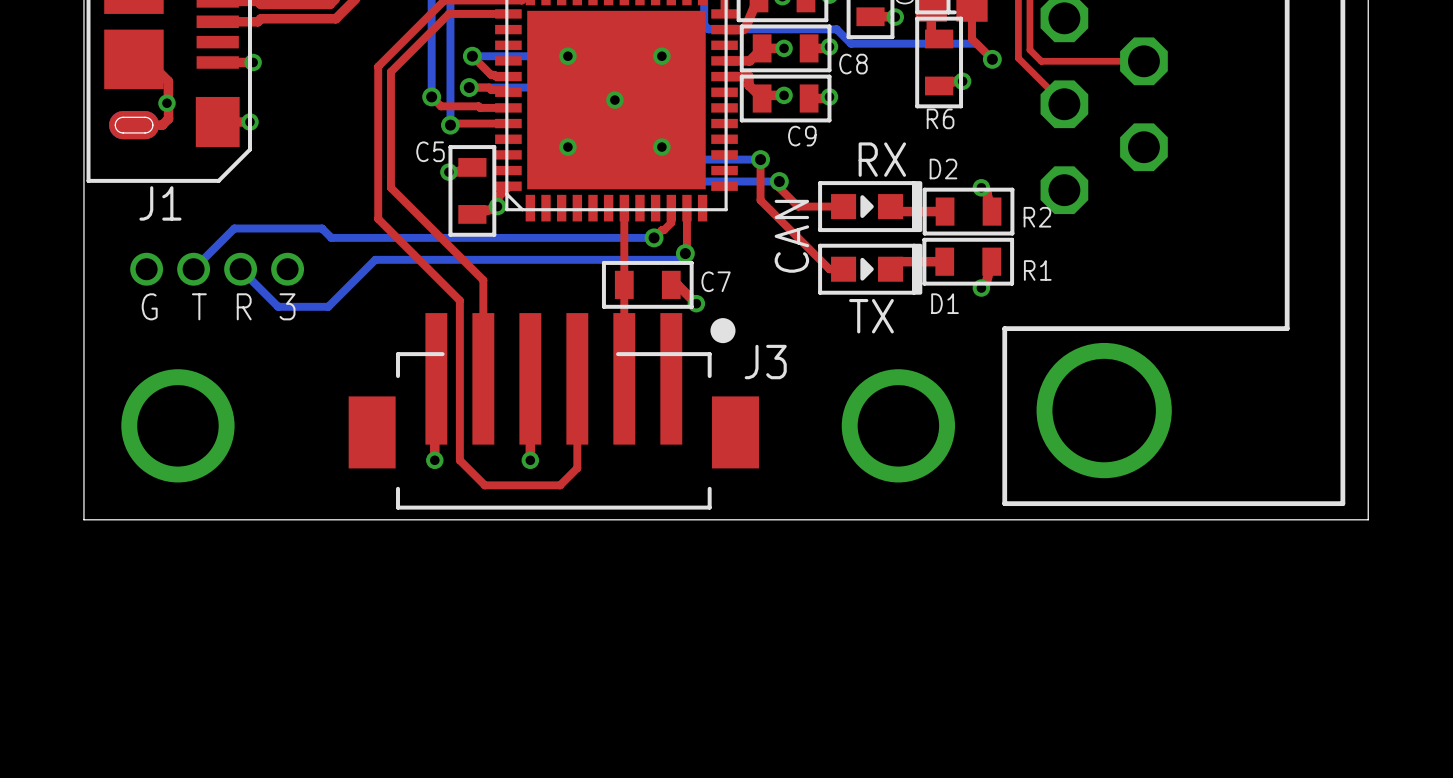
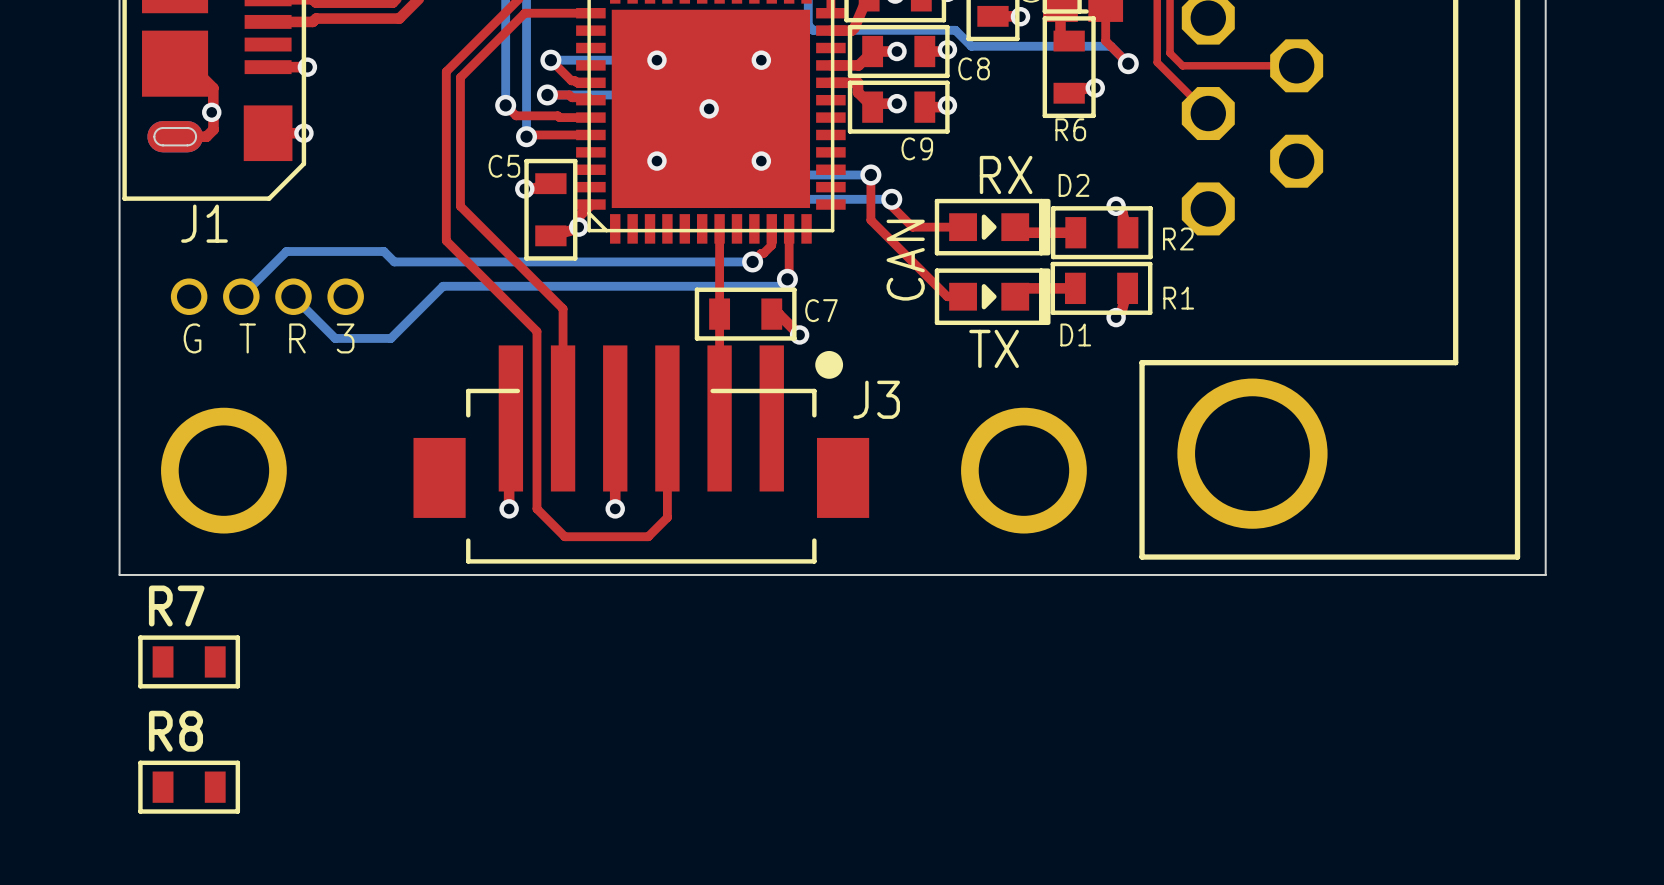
R7: none -> (189, 661)
R8: none -> (189, 787)

